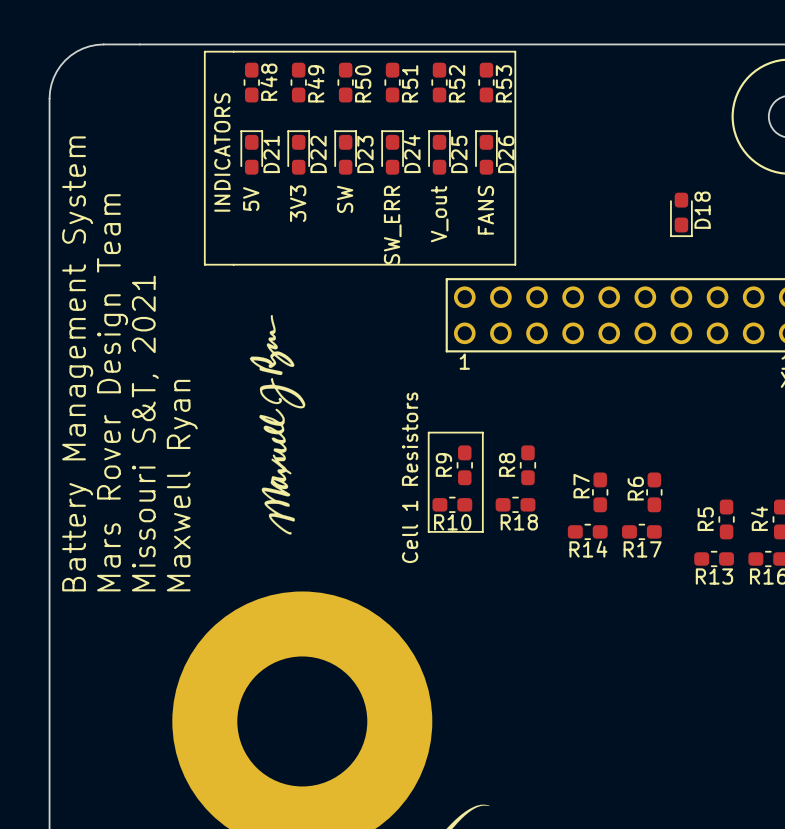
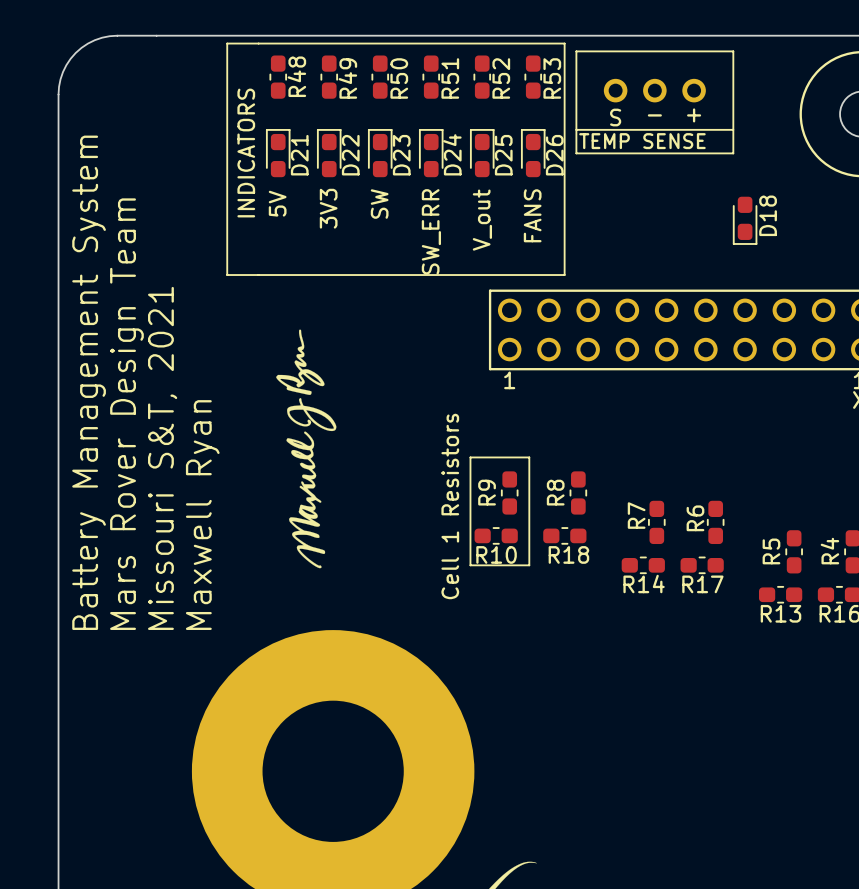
line: none -> (576, 51) (576, 153) (733, 153) (733, 51) (576, 51)
part: none -> (654, 90)
text: none -> - (654, 115)
text: none -> + (694, 115)
text: none -> S (615, 117)
line: none -> (576, 129) (733, 129)
text: none -> TEMP SENSE (642, 141)

